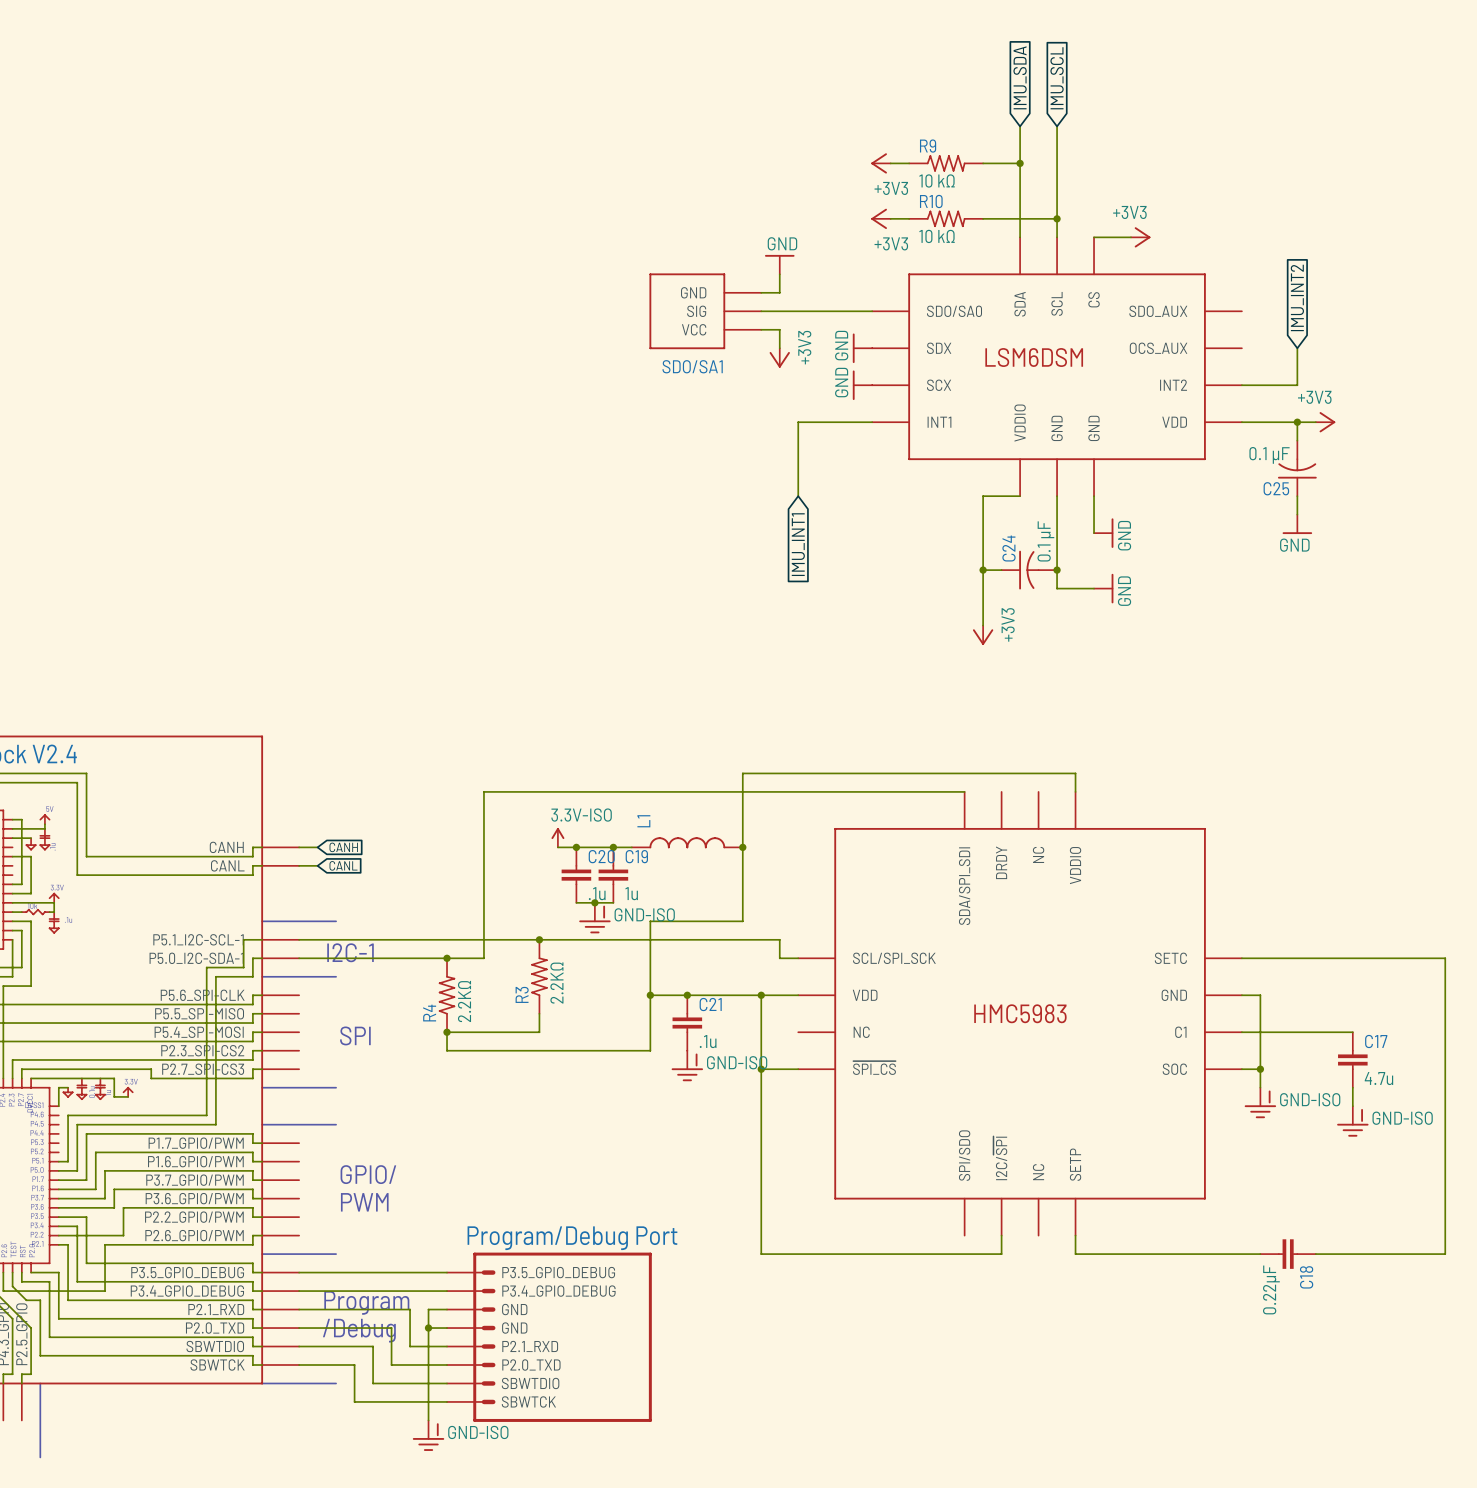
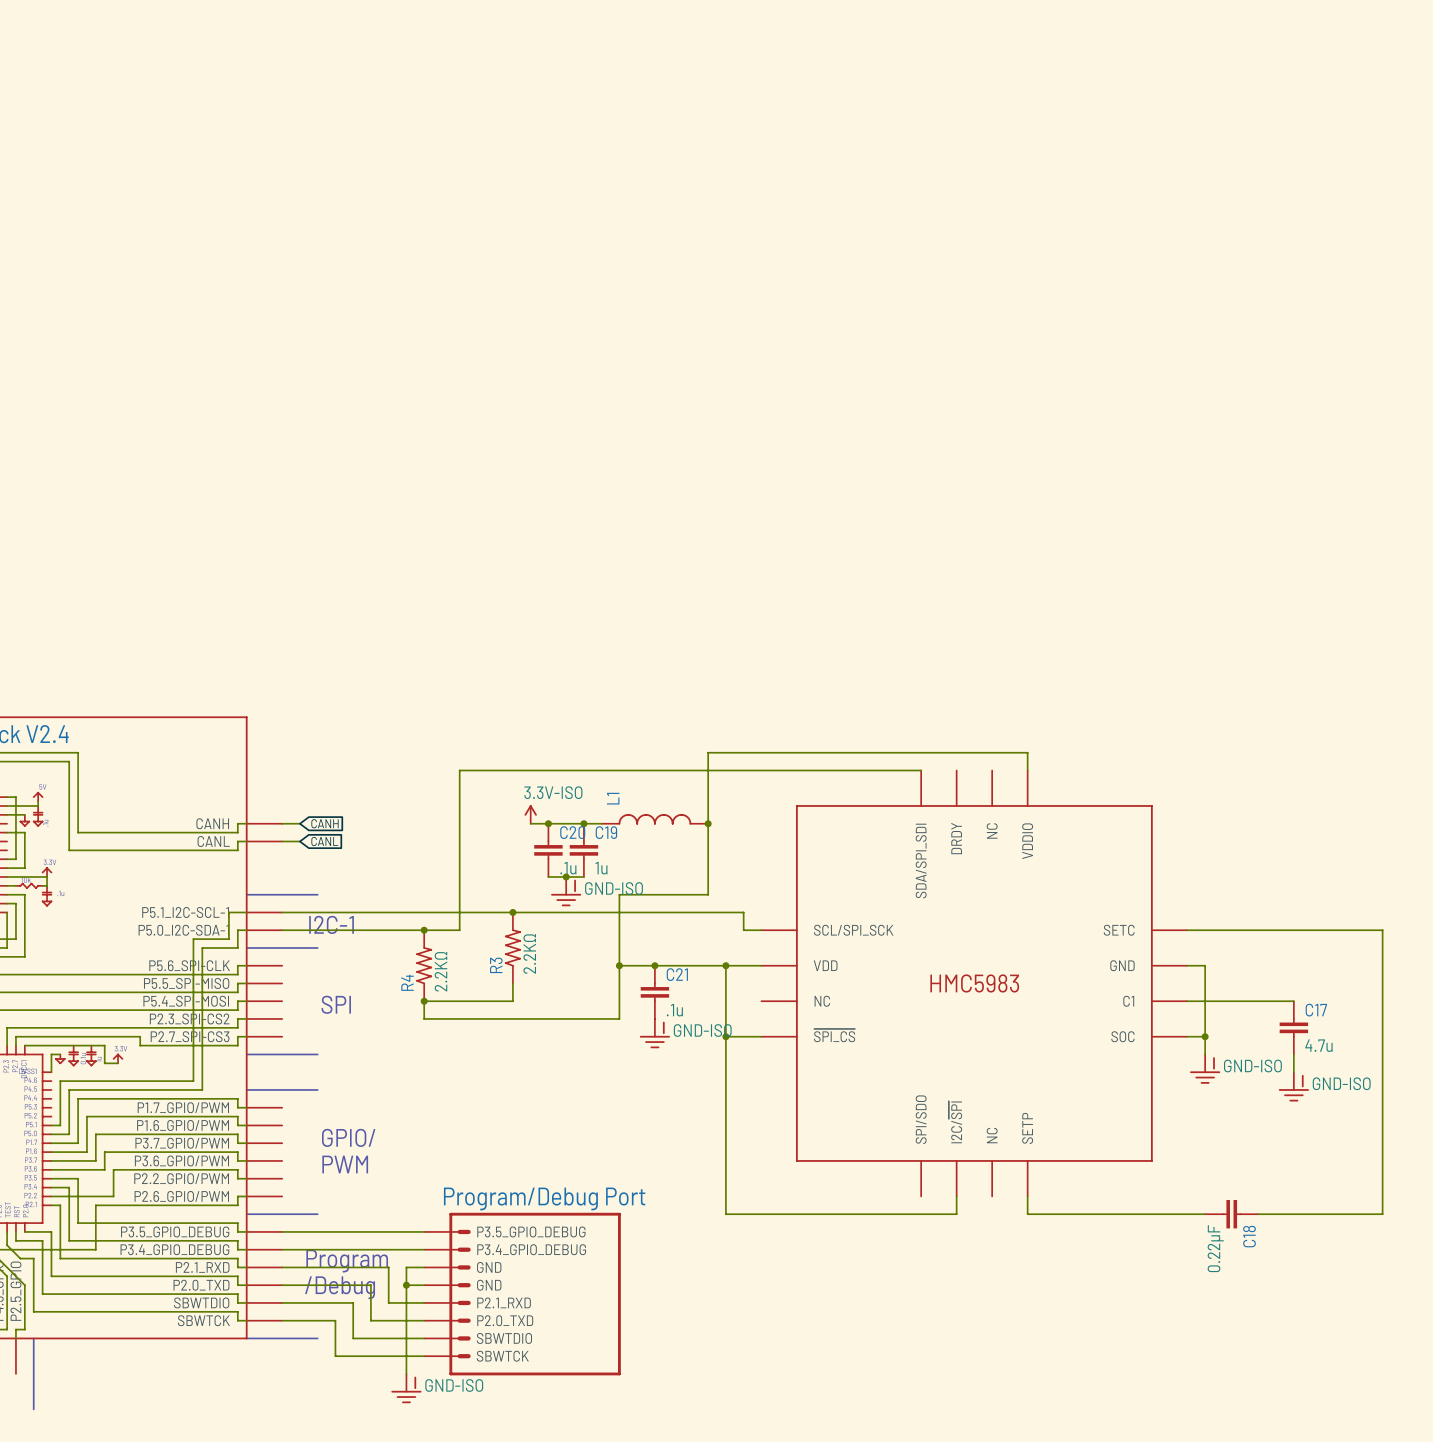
global label: IMU_SDA (1020, 77) -> none
global label: IMU_SCL (1057, 78) -> none
wire: (1020, 126) (1020, 237) -> none
wire: (1057, 126) (1057, 237) -> none
power symbol: +3V3 (880, 163) -> none
wire: (890, 163) (909, 163) -> none
R9: 10 kΩ (946, 163) -> none
wire: (983, 163) (1020, 163) -> none
junction: (1020, 163) -> none
power symbol: +3V3 (880, 218) -> none
wire: (890, 218) (909, 218) -> none
R10: 10 kΩ (946, 218) -> none
wire: (983, 218) (1057, 218) -> none
junction: (1057, 218) -> none
wire: (1094, 237) (1130, 237) -> none
power symbol: +3V3 (1140, 237) -> none
power symbol: GND (779, 264) -> none
wire: (779, 274) (779, 292) (761, 292) -> none
global label: IMU_INT2 (1297, 297) -> none
SDO/SA1: (705, 311) -> none
wire: (761, 311) (872, 311) -> none
wire: (761, 329) (779, 329) (779, 348) -> none
power symbol: GND (862, 348) -> none
wire: (1297, 348) (1297, 385) (1241, 385) -> none
power symbol: +3V3 (779, 357) -> none
part: (1057, 366) -> none
power symbol: GND (862, 385) -> none
wire: (872, 422) (798, 422) (798, 496) -> none
wire: (1241, 422) (1315, 422) -> none
wire: (1297, 422) (1297, 440) -> none
junction: (1297, 422) -> none
power symbol: +3V3 (1325, 422) -> none
C25: 0.1 μF (1297, 468) -> none
wire: (1020, 496) (983, 496) (983, 625) -> none
wire: (1057, 496) (1057, 588) (1094, 588) -> none
wire: (1094, 496) (1094, 533) -> none
wire: (1297, 496) (1297, 514) -> none
power symbol: GND (1297, 524) -> none
power symbol: GND (1103, 533) -> none
global label: IMU_INT1 (798, 544) -> none
wire: (983, 570) (1001, 570) -> none
junction: (983, 570) -> none
C24: 0.1 μF (1029, 570) -> none
junction: (1057, 570) -> none
power symbol: GND (1103, 588) -> none
power symbol: +3V3 (983, 635) -> none

